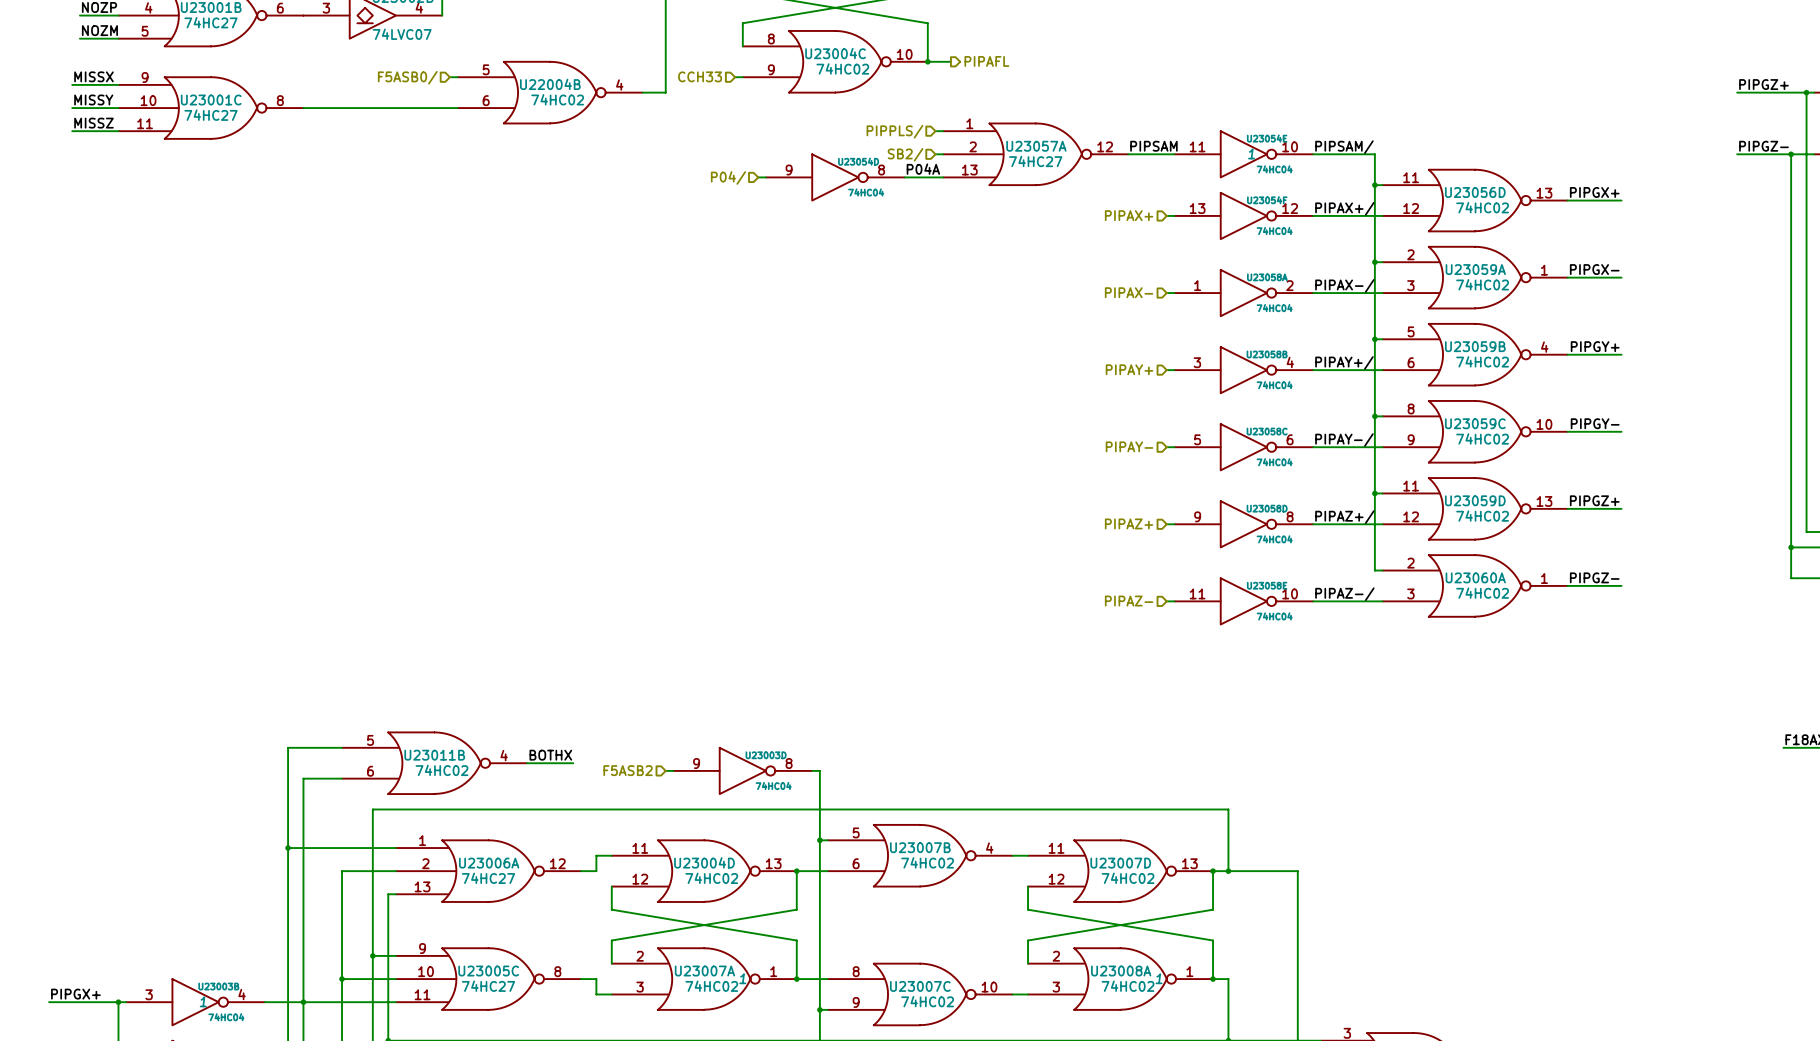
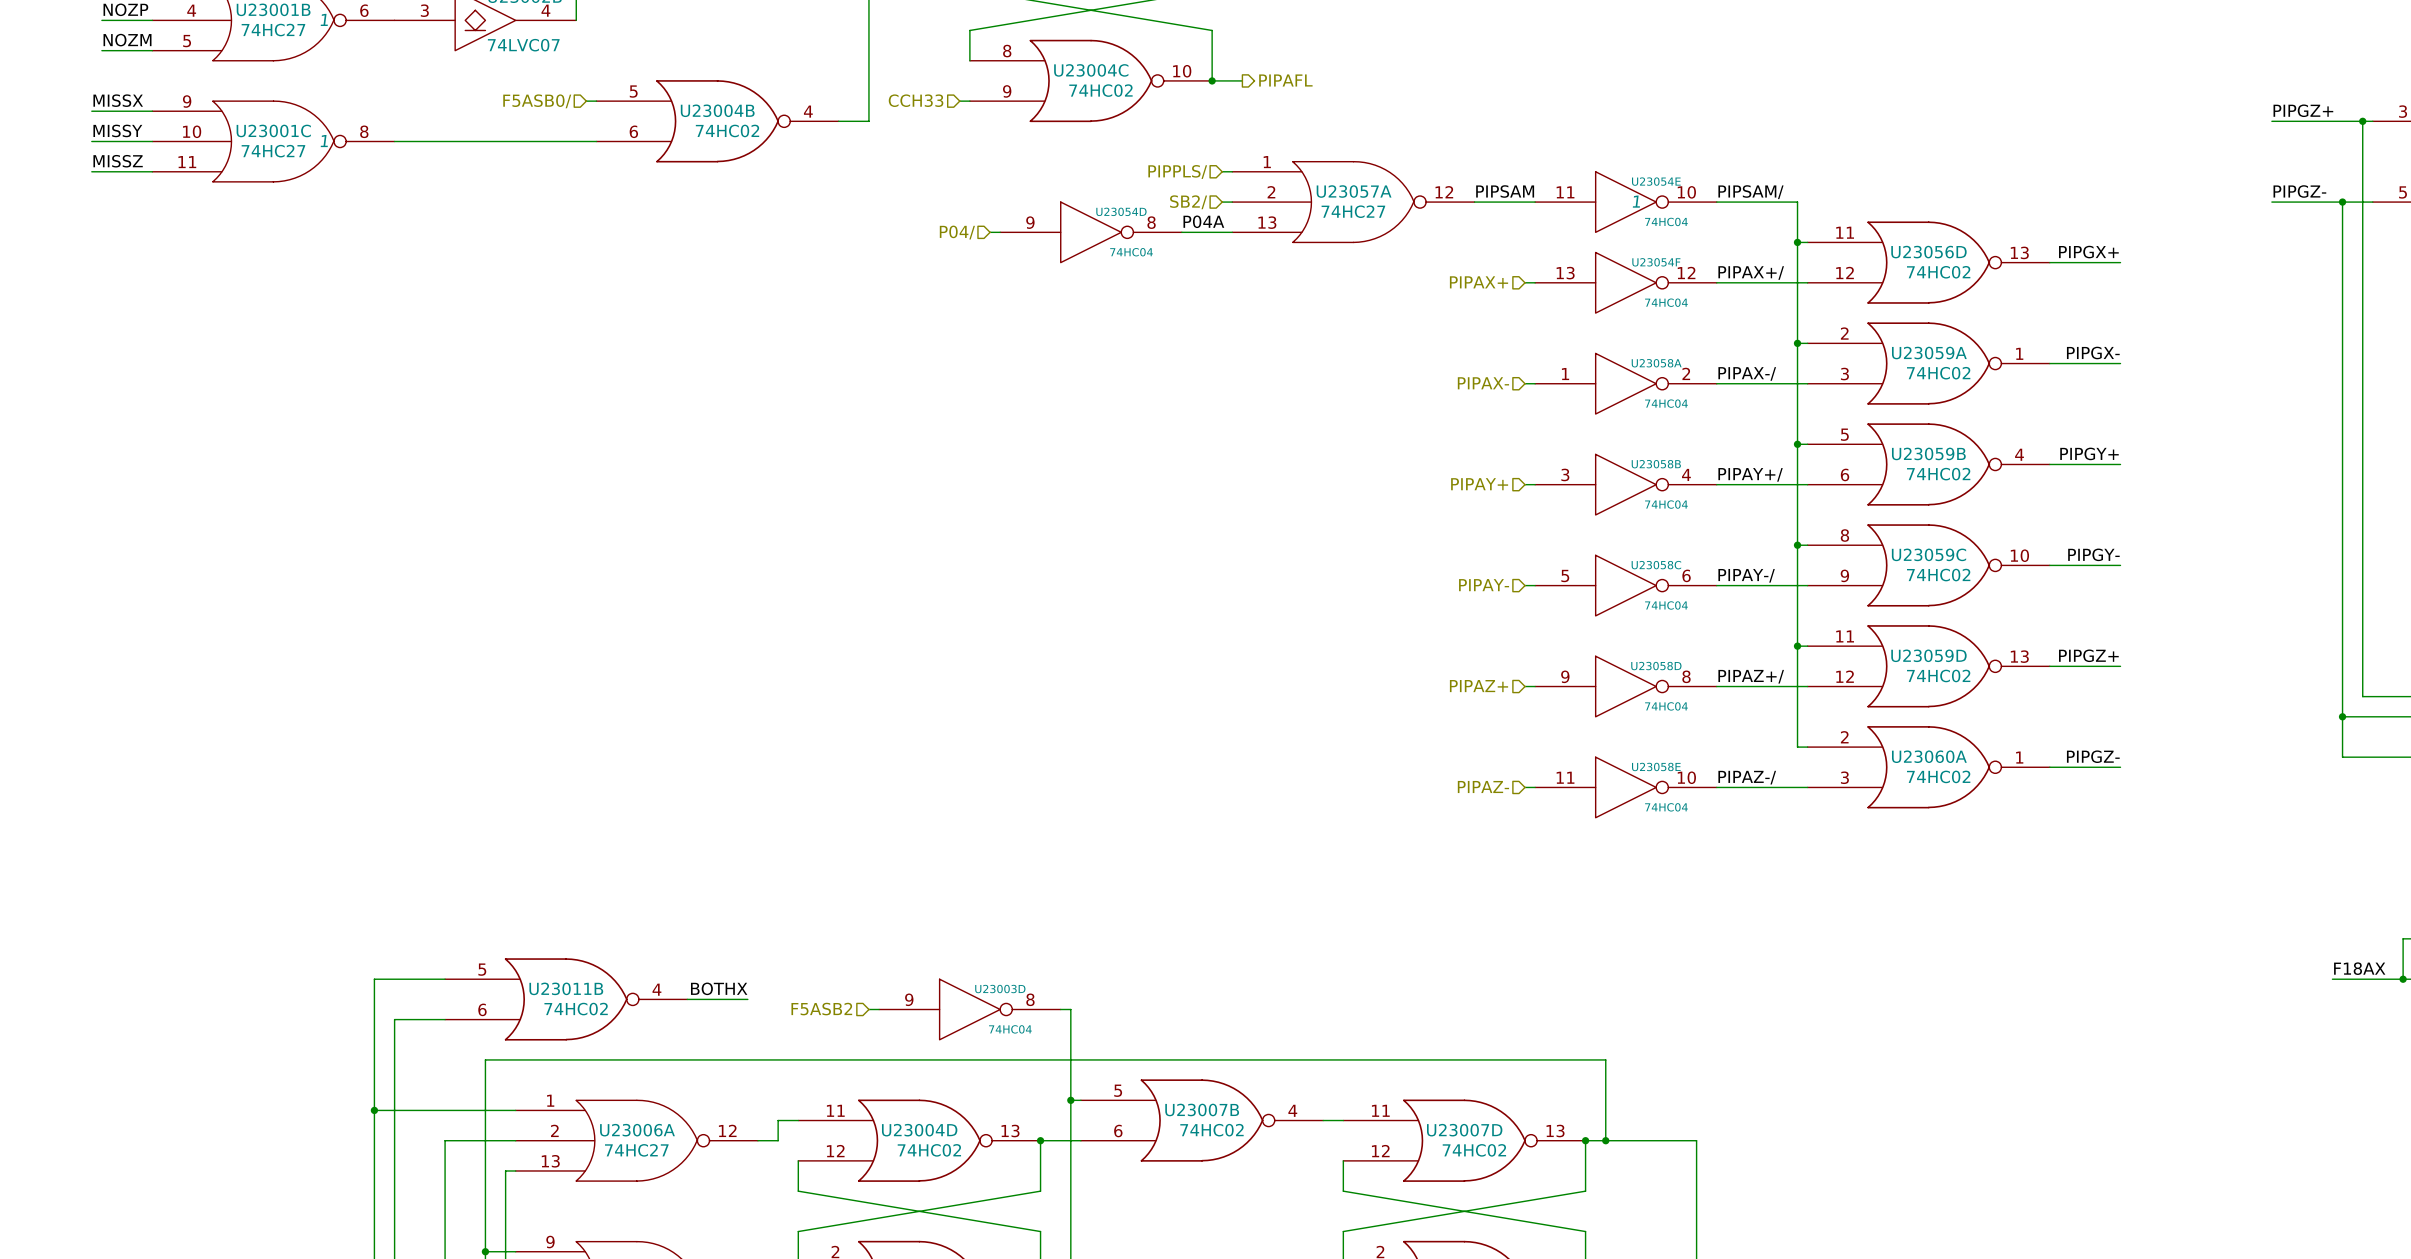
U23001B text: none -> 1 (324, 19)
U22004B name: U22004B (550, 84) -> U23004B (717, 110)
U23001C text: none -> 1 (324, 141)

